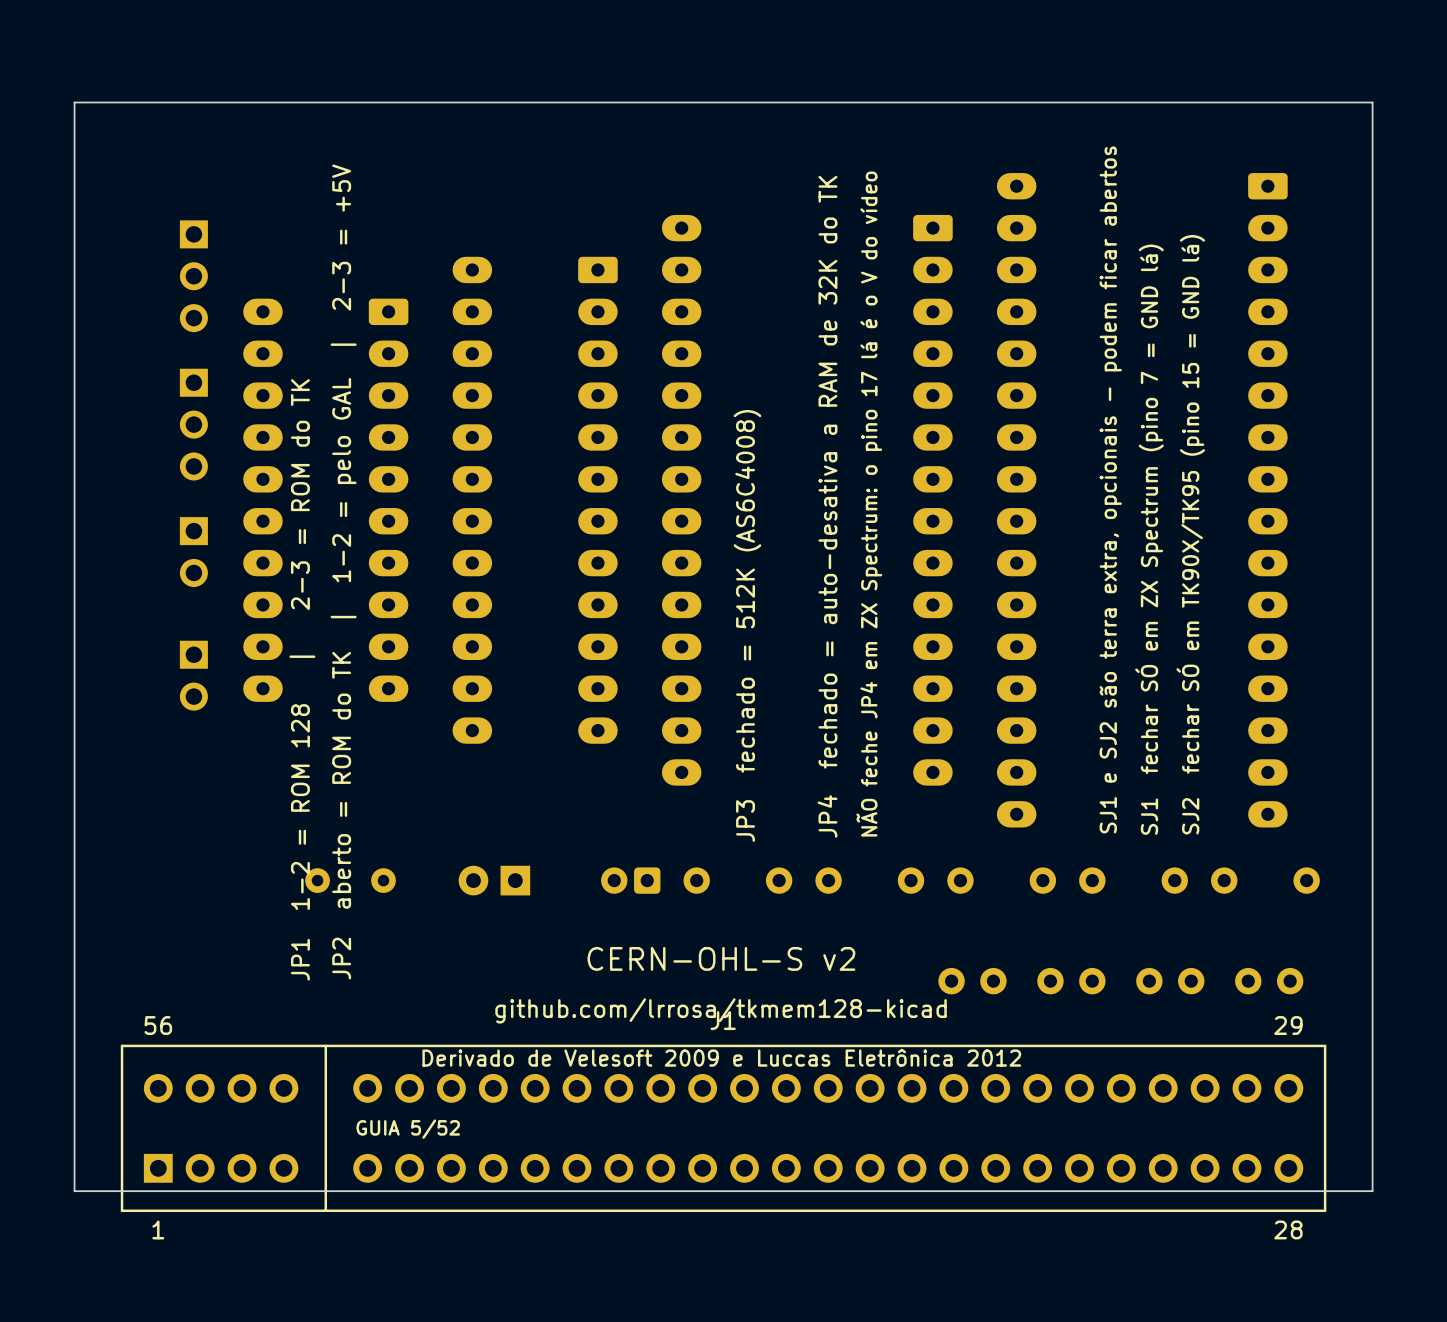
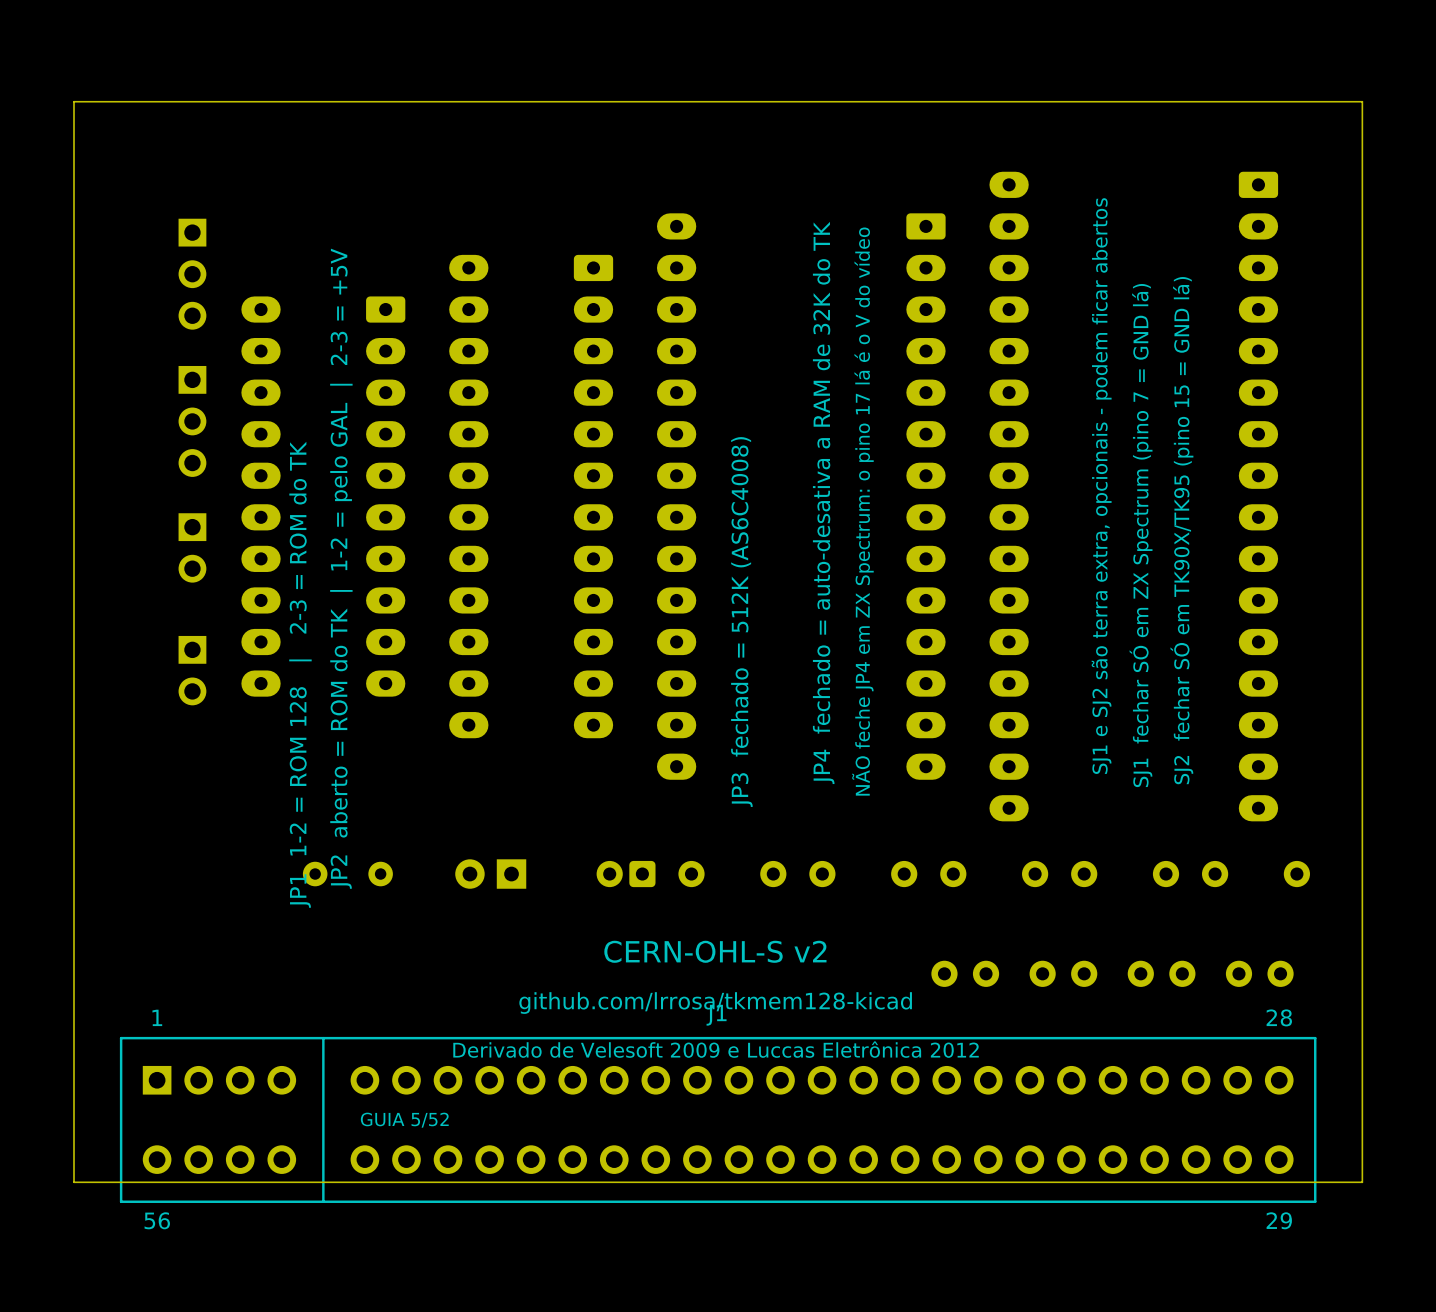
J1 footprint: [120, 1044, 1327, 1213] -> [119, 1036, 1317, 1203]

